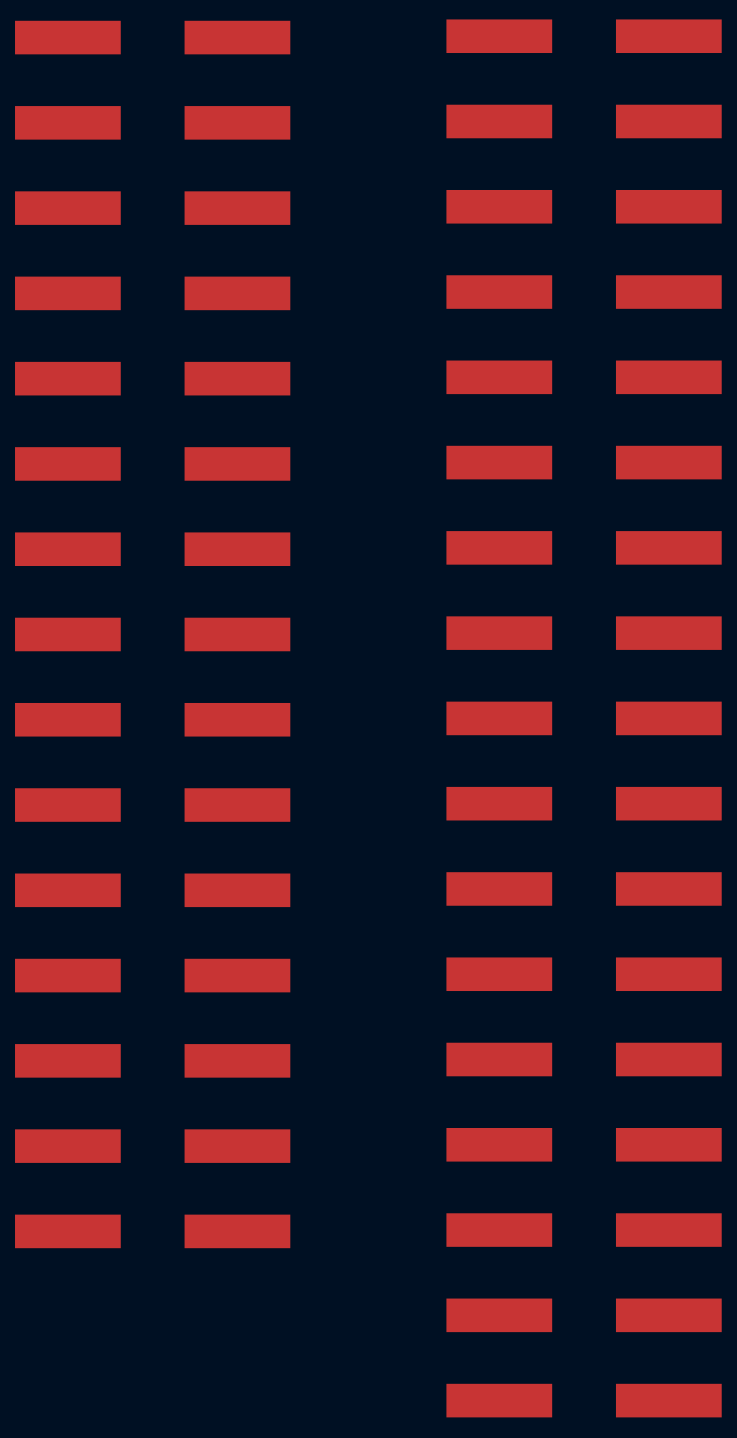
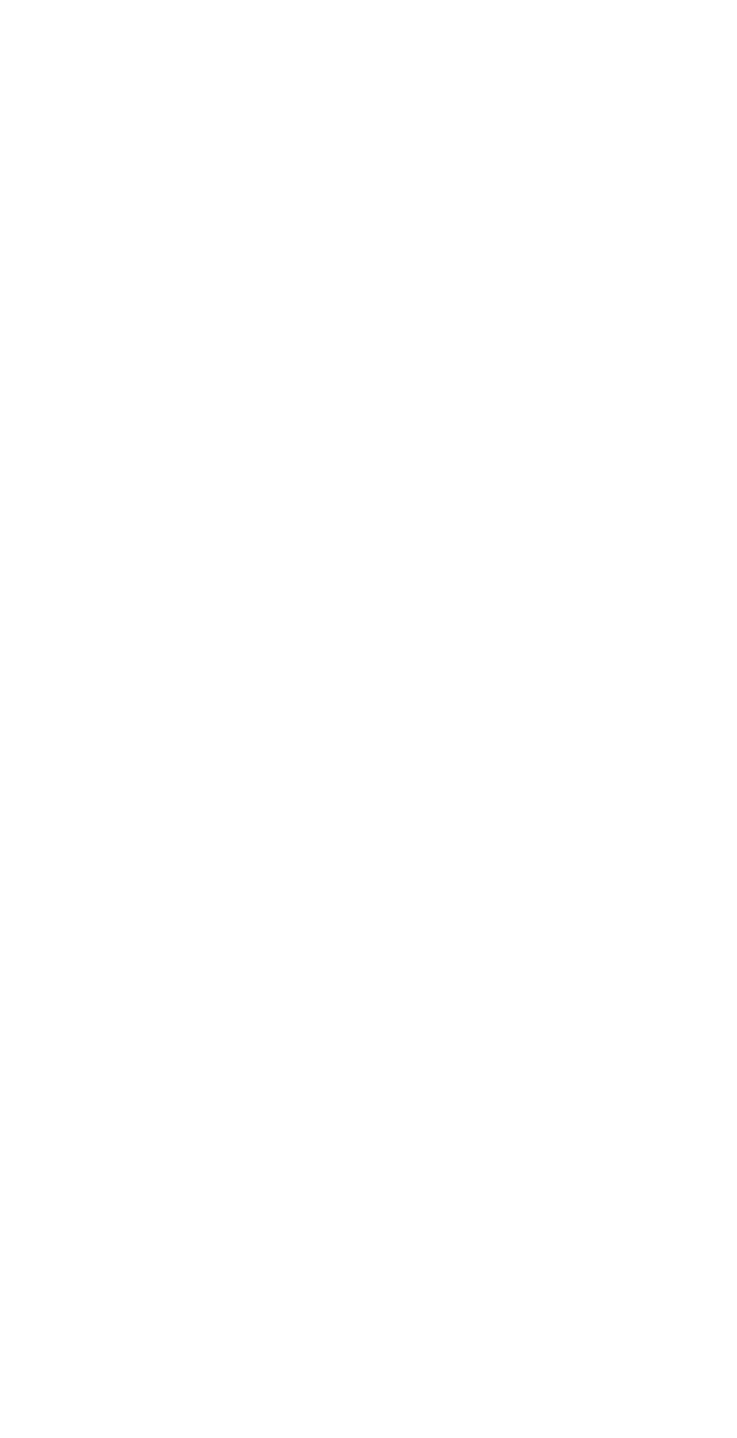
part: (152, 634) -> none
part: (584, 718) -> none

